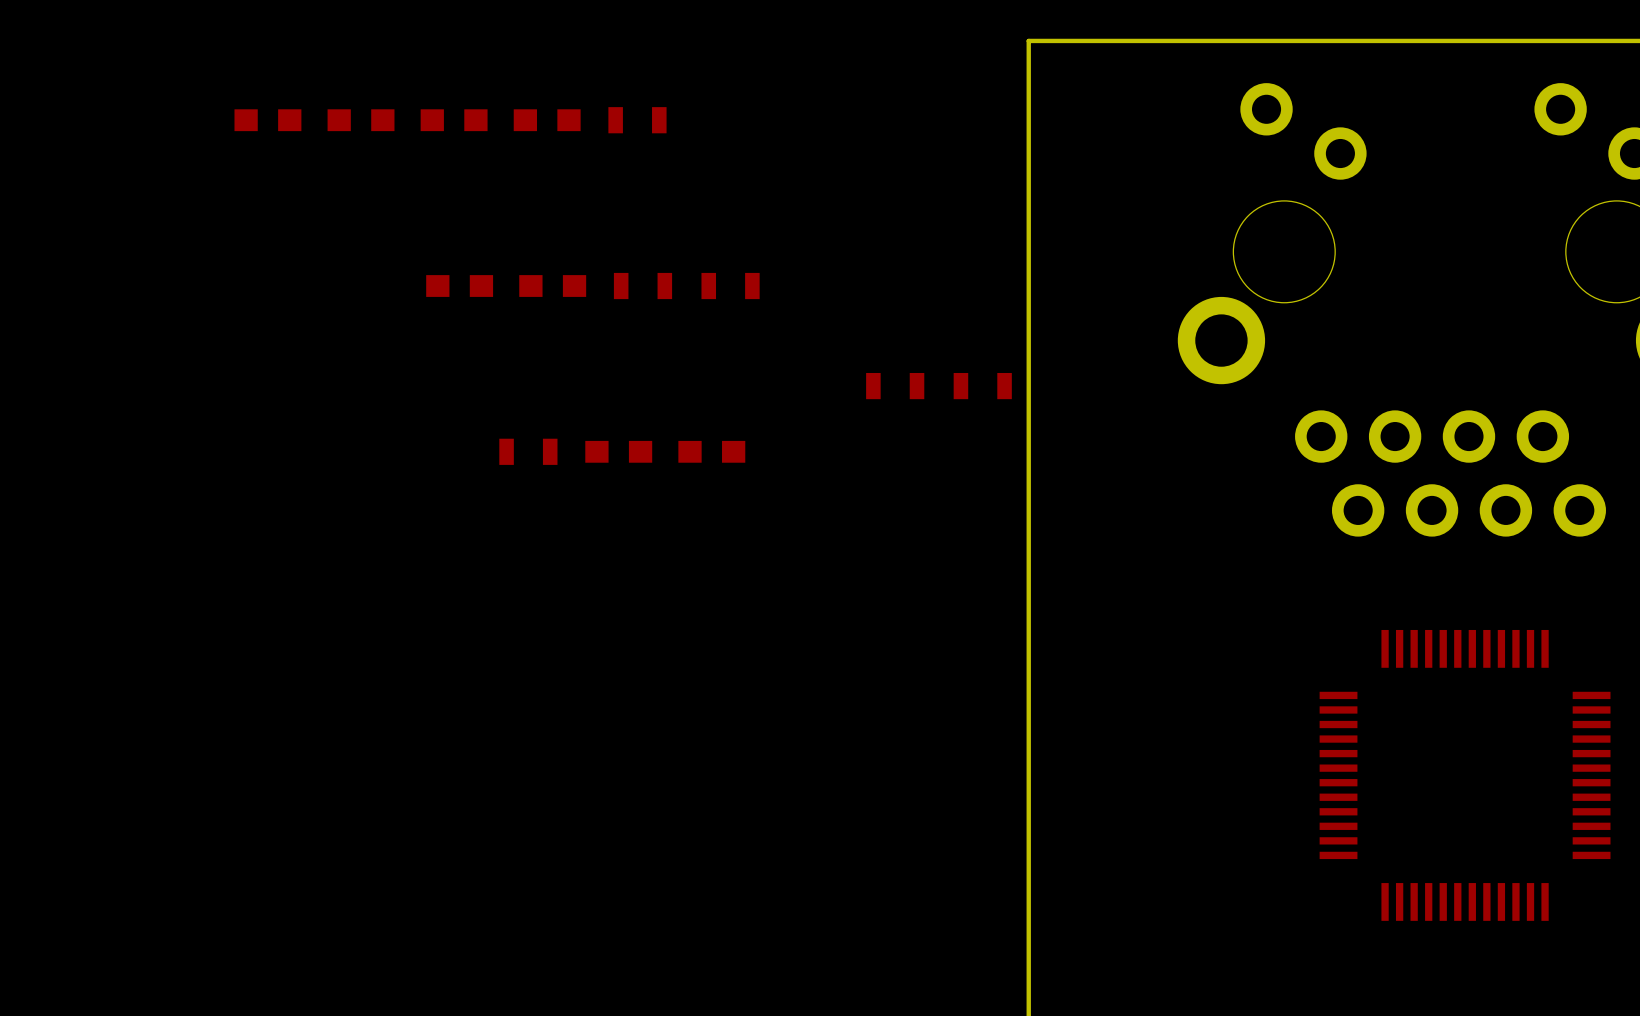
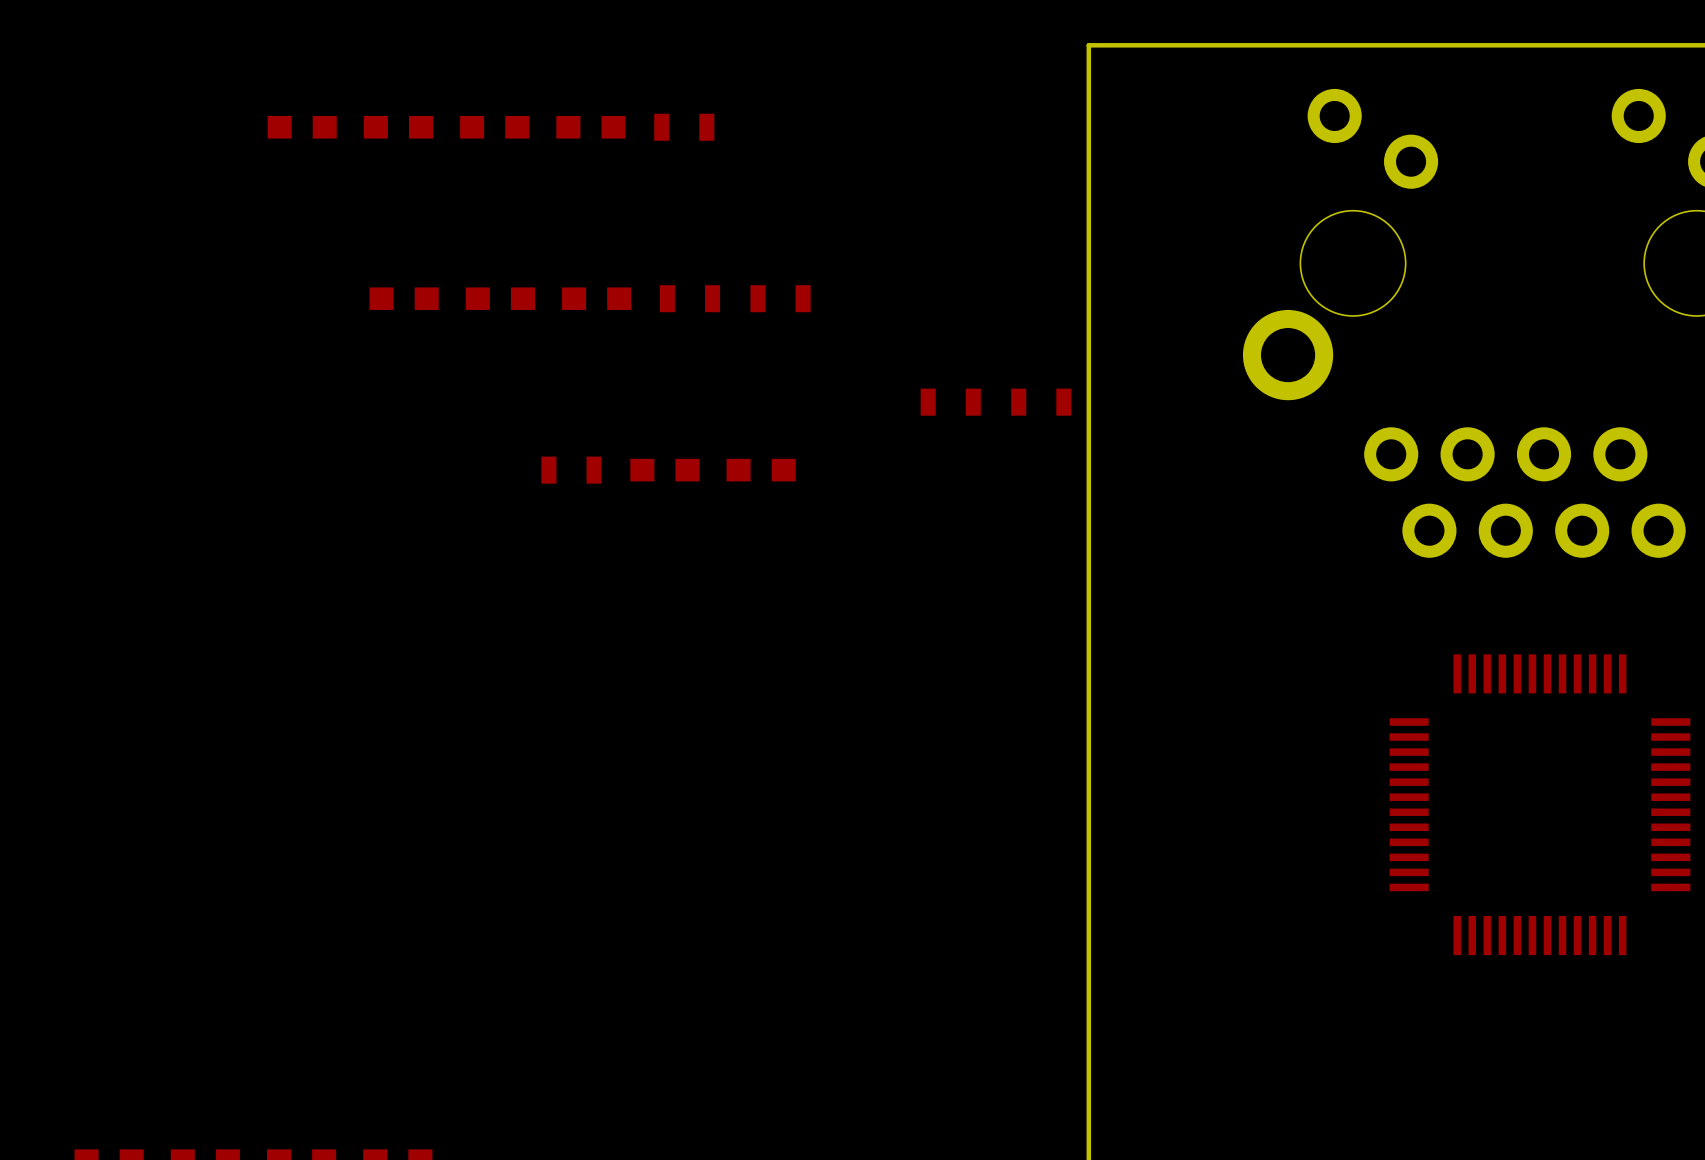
part: none -> (404, 298)

